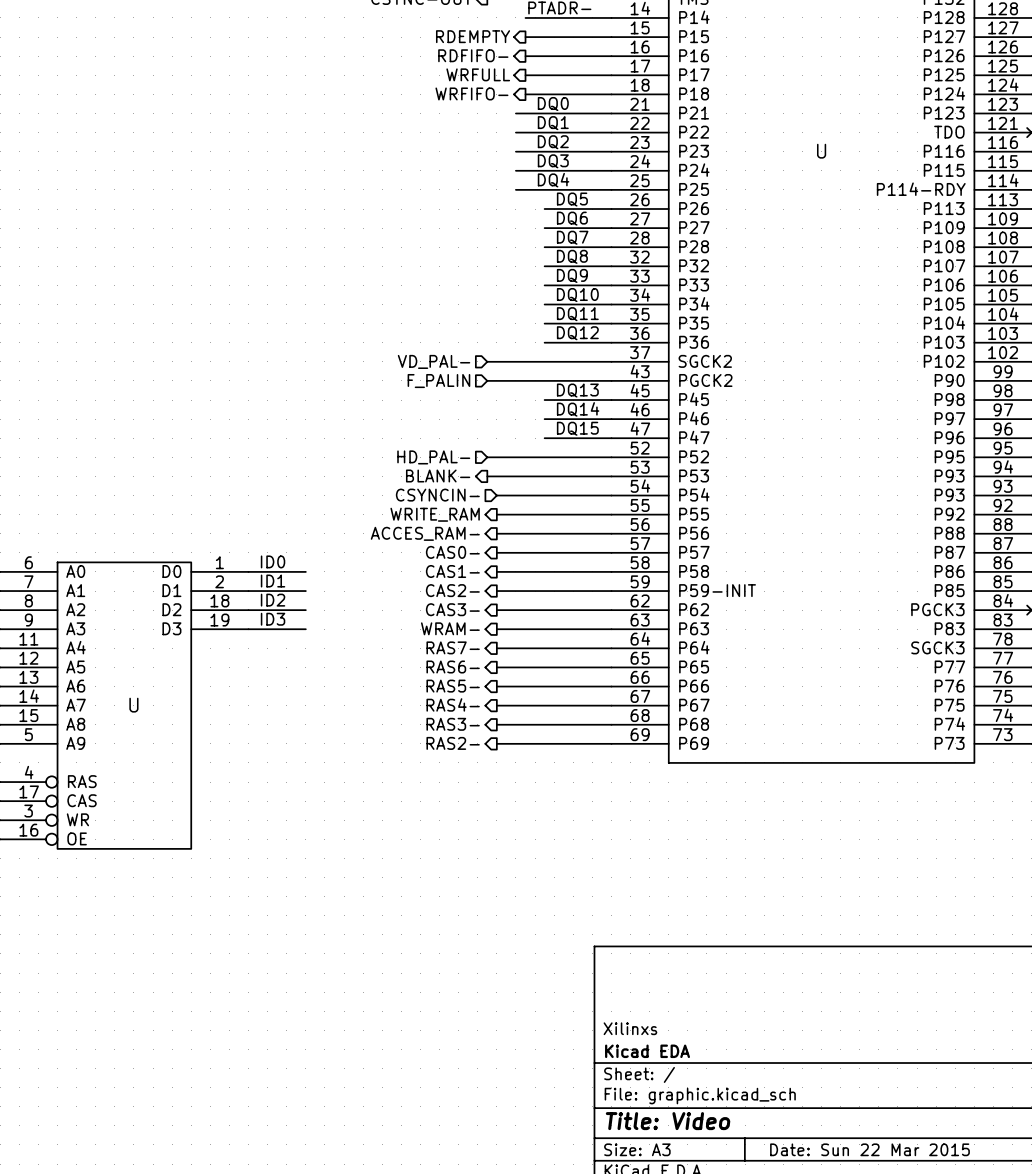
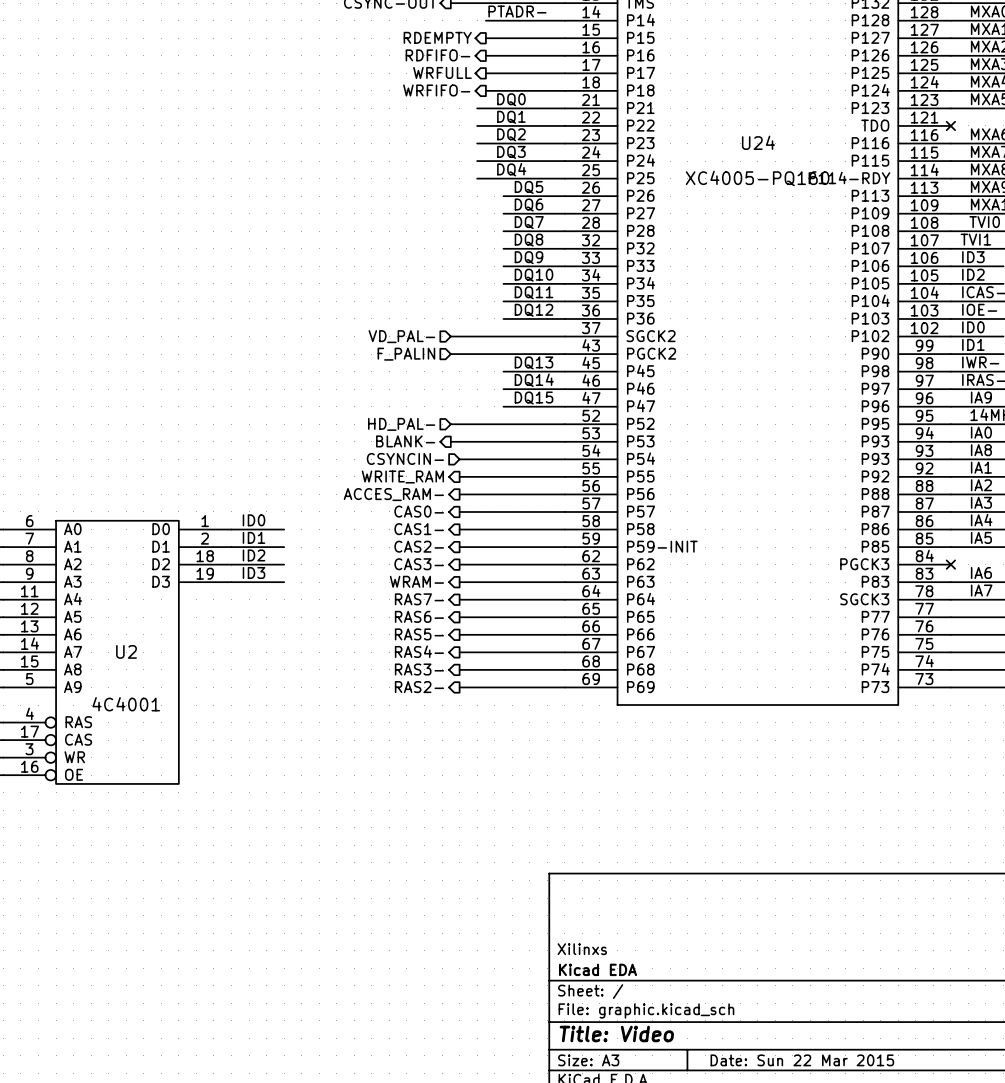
U name: U (821, 151) -> U24 (758, 142)
U value: none -> XC4005-PQ160 (757, 178)
U name: U (133, 705) -> U2 (126, 651)
U value: none -> 4C4001 (126, 704)

